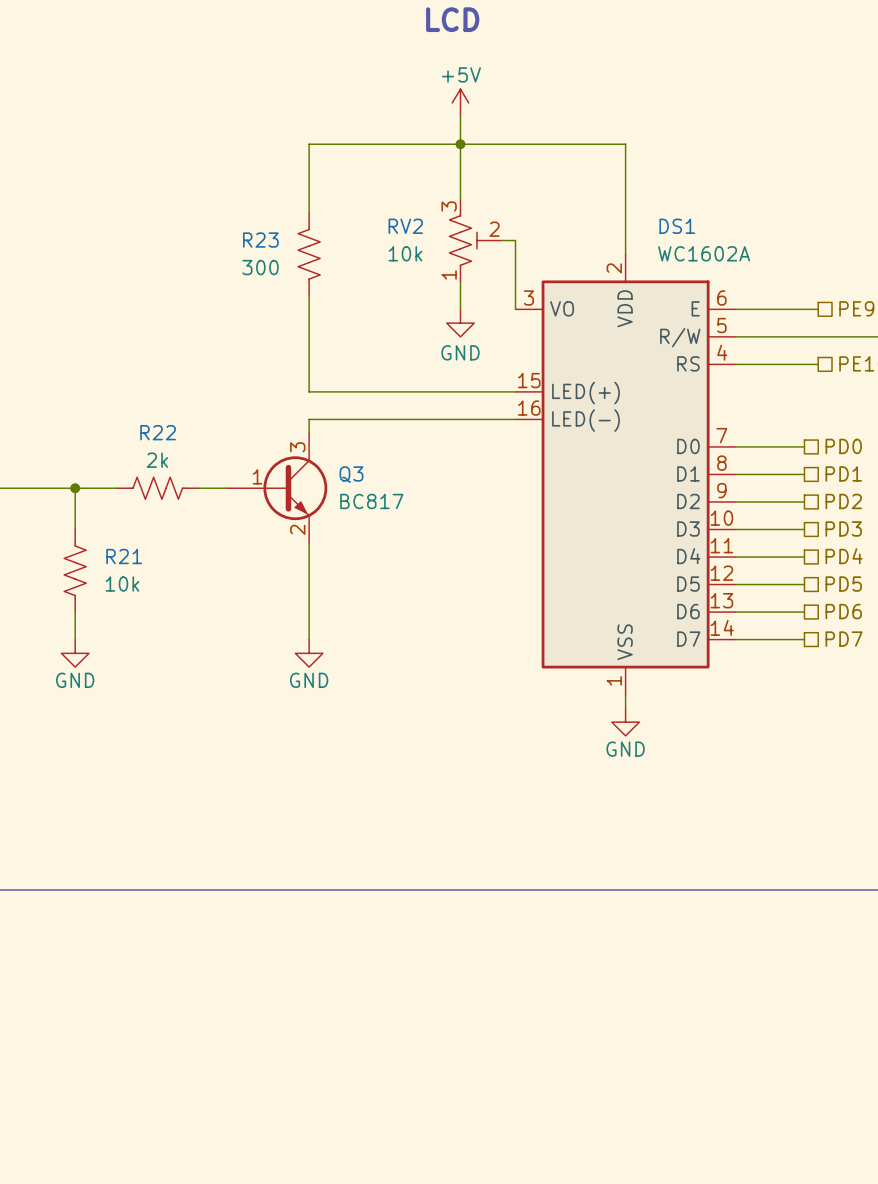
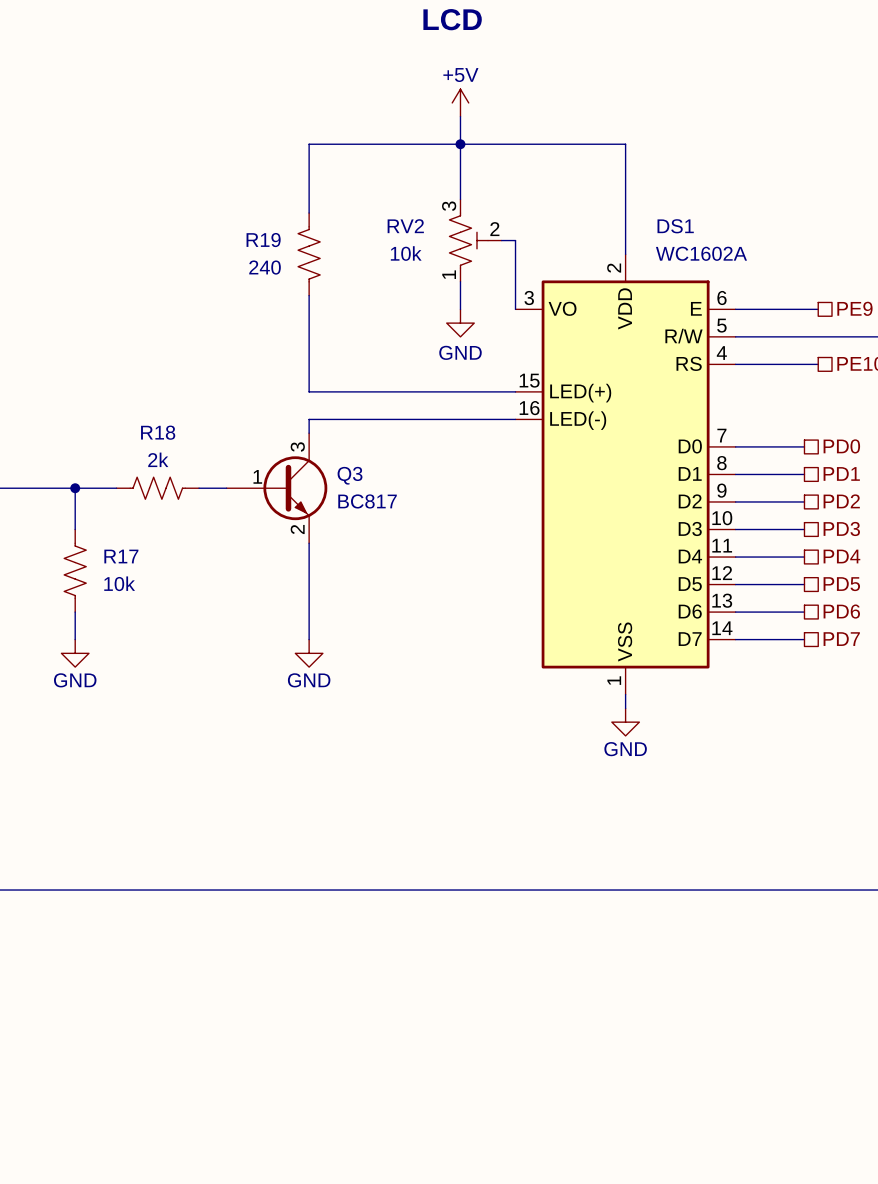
R23 name: R23 (260, 240) -> R19 (263, 240)
R23 value: 300 (260, 267) -> 240 (265, 267)
R22 name: R22 (158, 432) -> R18 (158, 432)
R21 name: R21 (124, 556) -> R17 (121, 556)

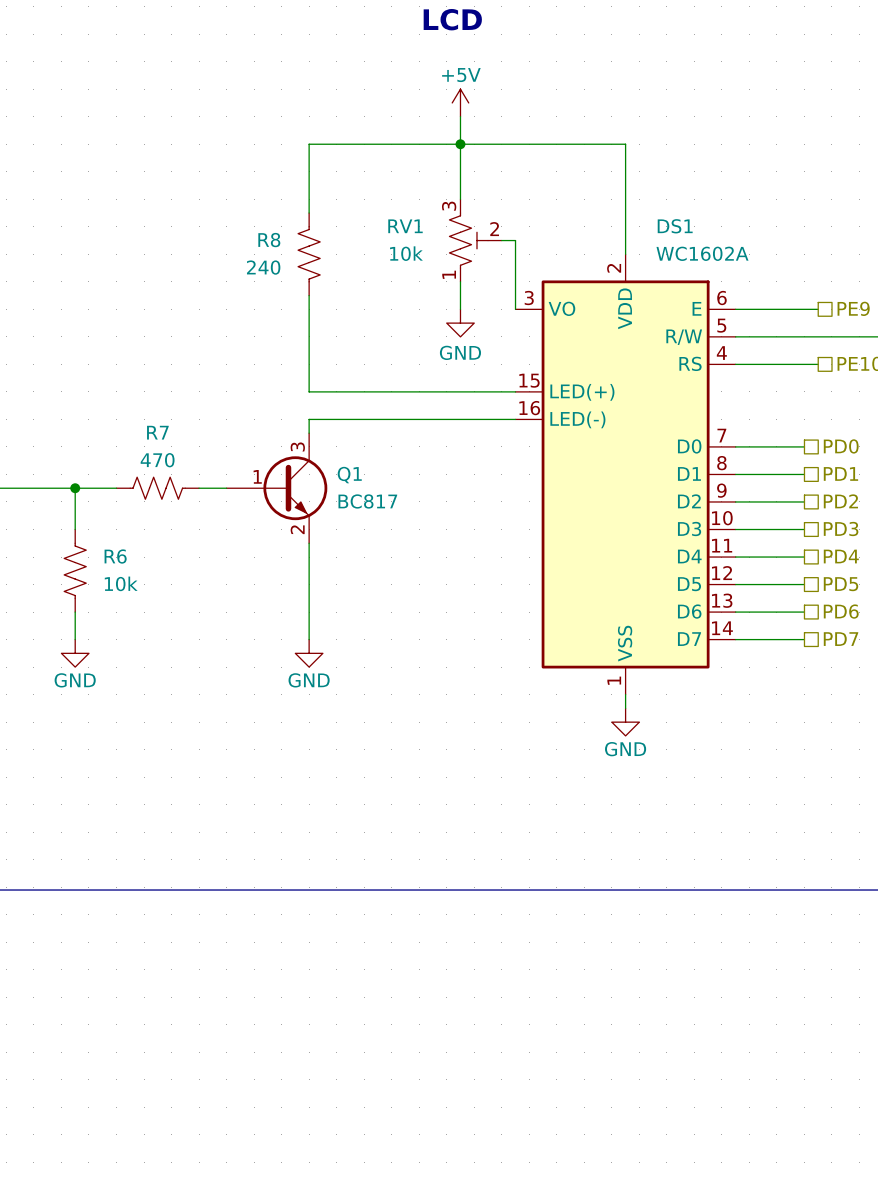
RV2 name: RV2 (405, 226) -> RV1 (405, 226)
R19 name: R19 (263, 240) -> R8 (269, 240)
R18 name: R18 (158, 432) -> R7 (157, 432)
R18 value: 2k (158, 459) -> 470 (157, 460)
Q3 name: Q3 (350, 475) -> Q1 (349, 475)
R17 name: R17 (121, 556) -> R6 (115, 556)

